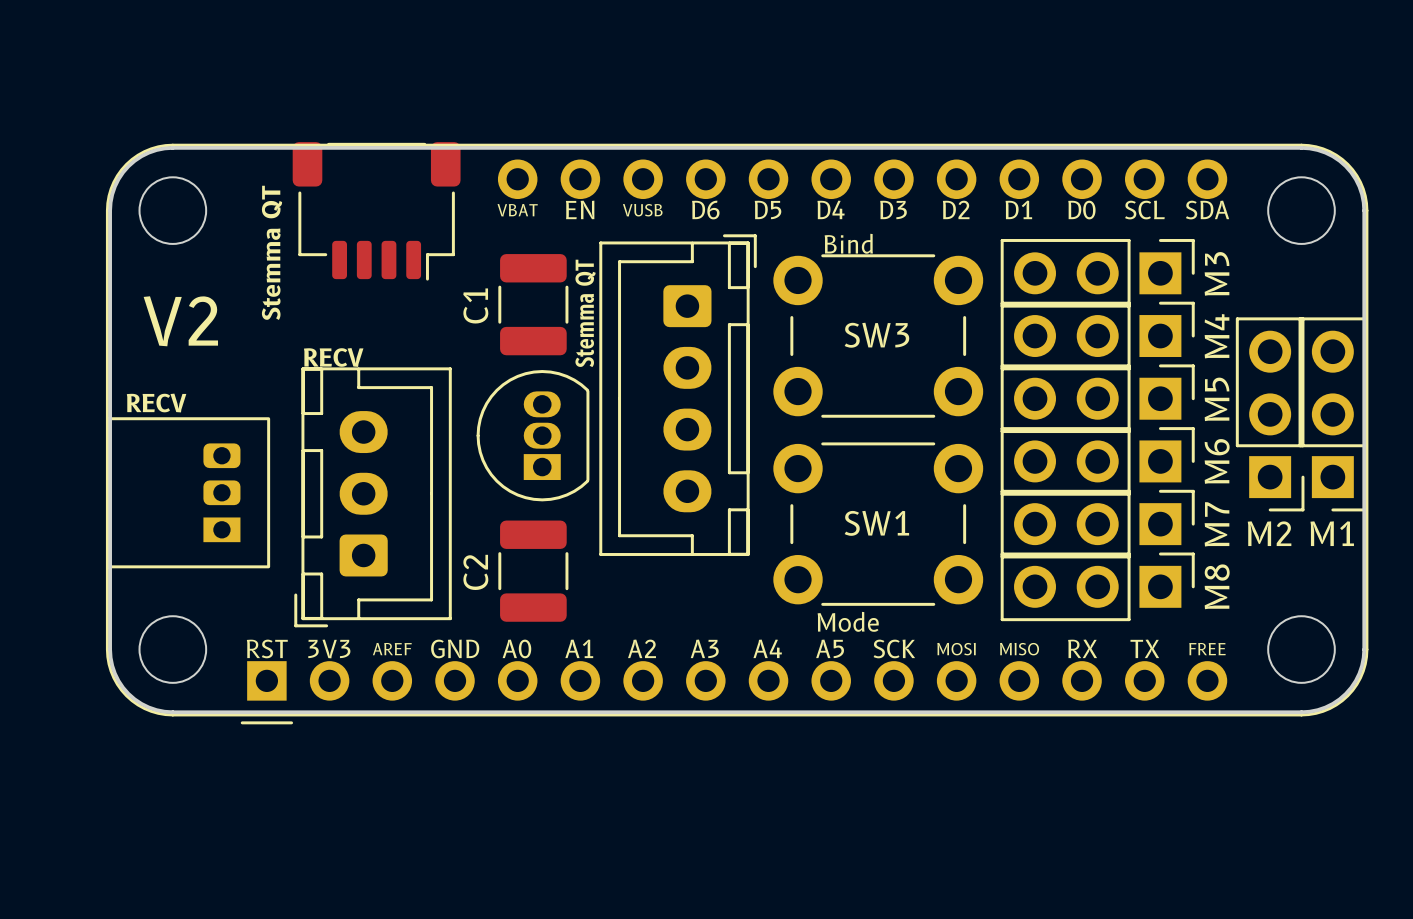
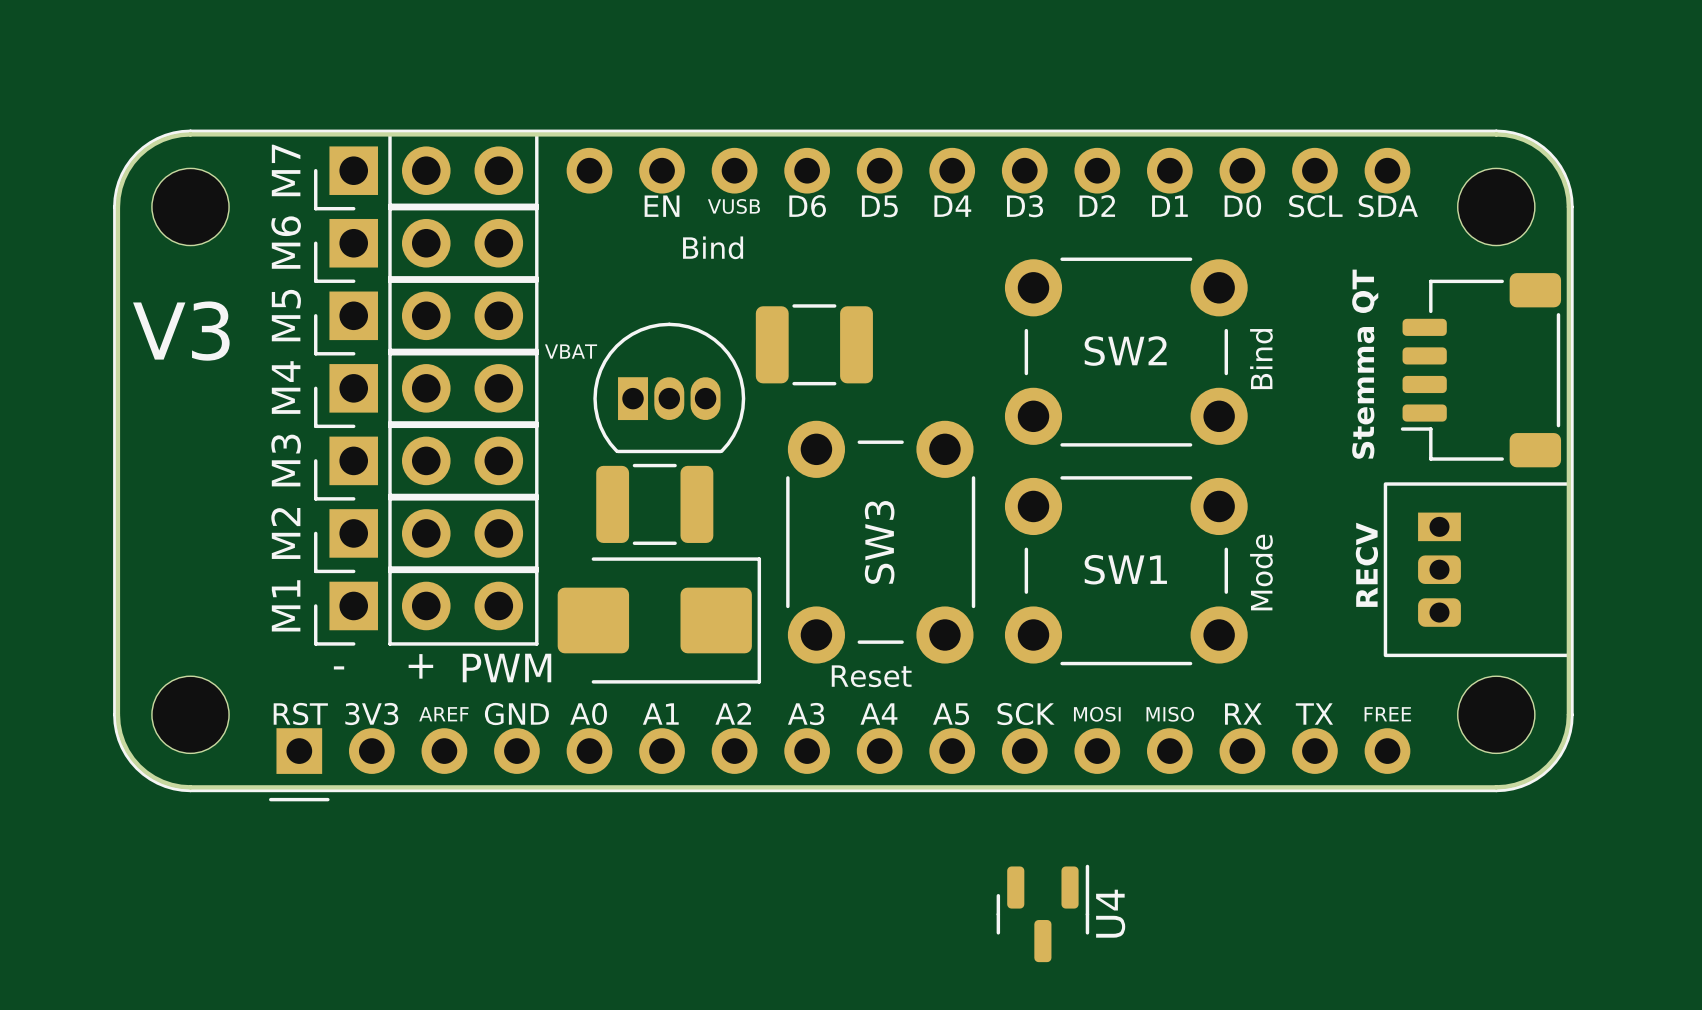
text position: VBAT (517, 210) -> VBAT (571, 351)
part: (376, 211) -> none
text: Bind (848, 243) -> none
text: none -> Bind (713, 247)
text: Stemma QT (271, 252) -> none
M3 rotation: 0° (1097, 273) -> 180° (426, 460)
M3 position: (1097, 273) -> (426, 460)
C1: (533, 304) -> none
text: Stemma QT (585, 313) -> none
text: V2 (180, 321) -> V3 (181, 331)
part: none -> (814, 344)
SW3 rotation: 0° (878, 336) -> 90° clockwise (880, 542)
SW3 position: (878, 336) -> (880, 542)
SW2: none -> (1126, 352)
M4 rotation: 0° (1097, 336) -> 180° (426, 388)
M4 position: (1097, 336) -> (426, 388)
text: none -> Bind (1261, 359)
part: none -> (1480, 370)
text: RECV (333, 357) -> none
text: none -> Stemma QT (1365, 364)
part: (678, 395) -> none
M5 rotation: 0° (1097, 398) -> 180° (426, 315)
M5 position: (1097, 398) -> (426, 315)
text: RECV (156, 403) -> none
M2 rotation: 0° (1270, 414) -> 90° clockwise (426, 533)
M2 position: (1270, 414) -> (426, 533)
M1 rotation: 0° (1332, 414) -> 90° clockwise (426, 605)
M1 position: (1332, 414) -> (426, 605)
part rotation: 0° (533, 435) -> 90° clockwise (669, 387)
part position: (533, 435) -> (669, 387)
M6 rotation: 0° (1097, 461) -> 180° (426, 243)
M6 position: (1097, 461) -> (426, 243)
part: none -> (654, 504)
part: (188, 492) -> none
part: (373, 497) -> none
SW1 position: (878, 524) -> (1126, 570)
M7 rotation: 0° (1097, 524) -> 180° (426, 170)
M7 position: (1097, 524) -> (426, 170)
part: none -> (1478, 569)
text: none -> RECV (1366, 564)
part: none -> (659, 620)
C2: (533, 571) -> none
M8: (1097, 586) -> none
text: none -> + (420, 666)
text: none -> - (339, 667)
text: none -> PWM (507, 668)
text: none -> Reset (871, 676)
text rotation: 0° (848, 621) -> 90° counterclockwise (1261, 572)
text position: Mode (848, 621) -> Mode (1261, 572)
U4: none -> (1042, 913)

